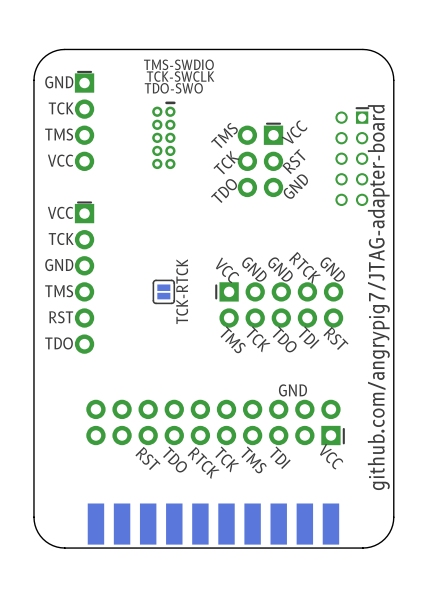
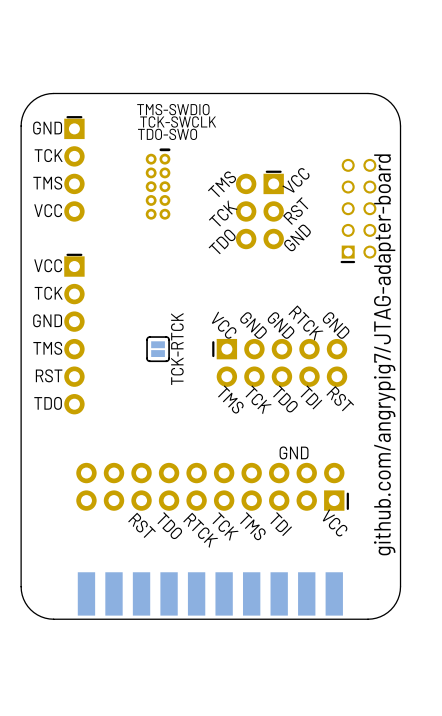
part rotation: 0° (352, 156) -> 180° (358, 210)

